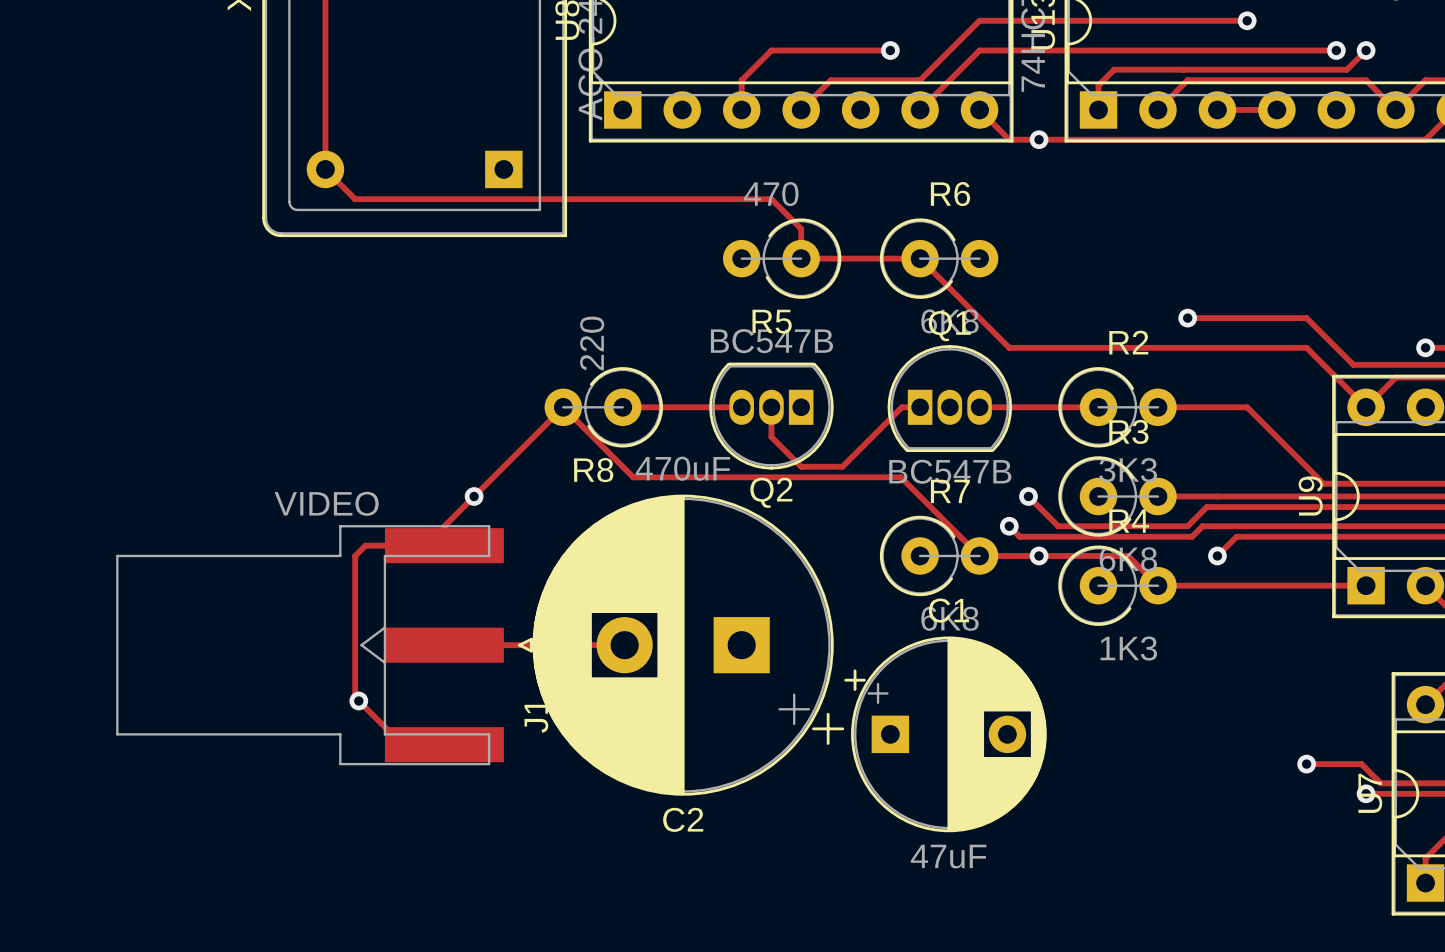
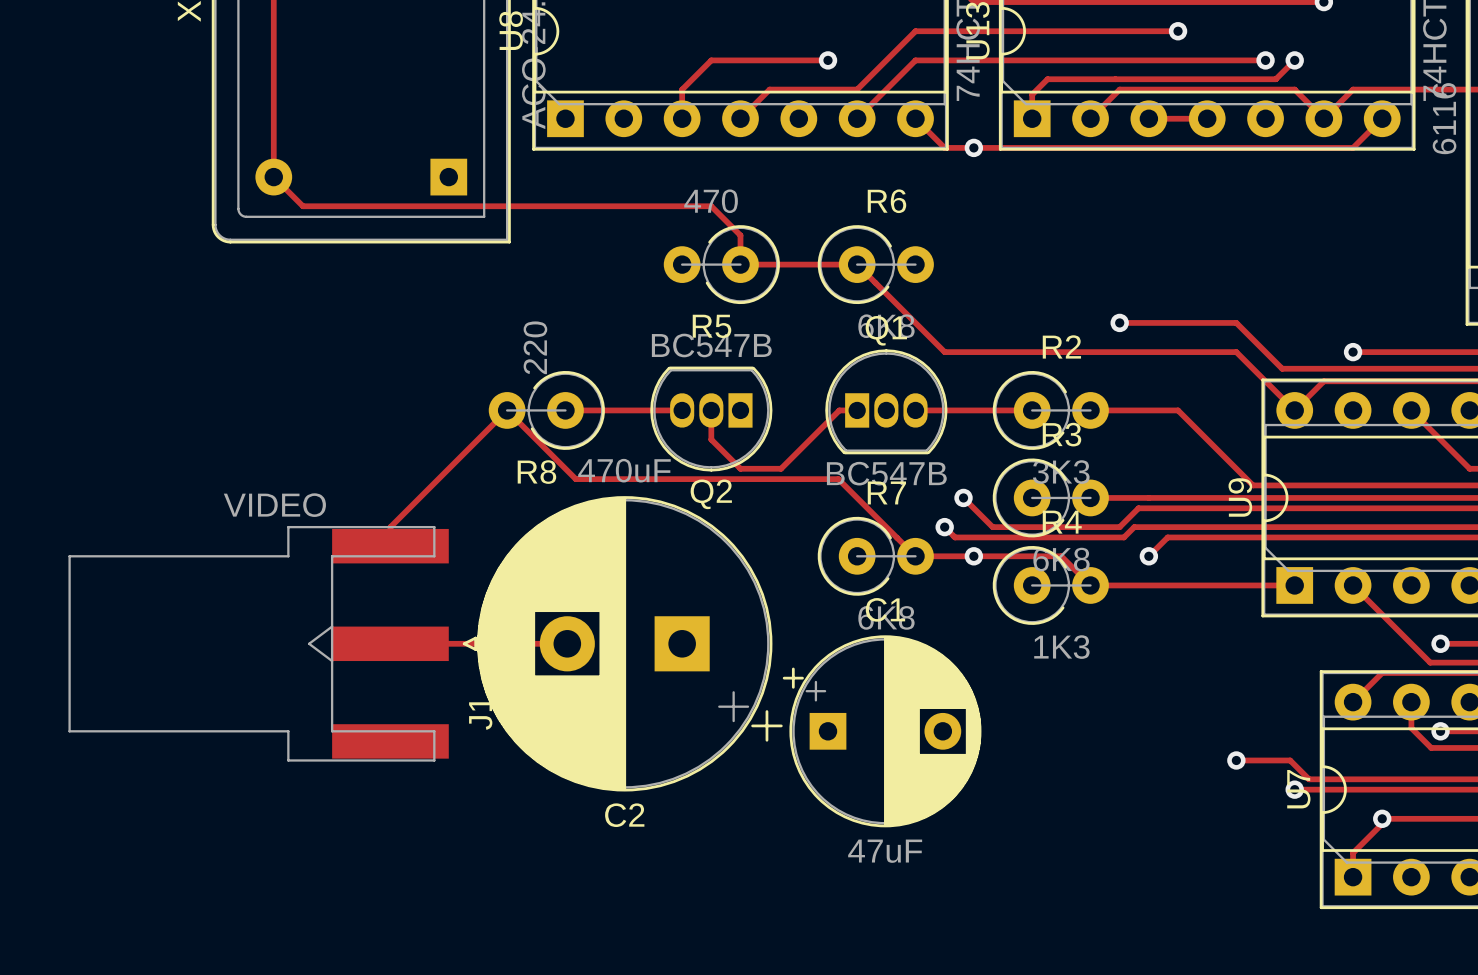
via: (474, 496) -> none
track: (444, 545) (365, 545) (355, 555) (355, 697) (402, 744) (444, 744) -> none
via: (358, 701) -> none

